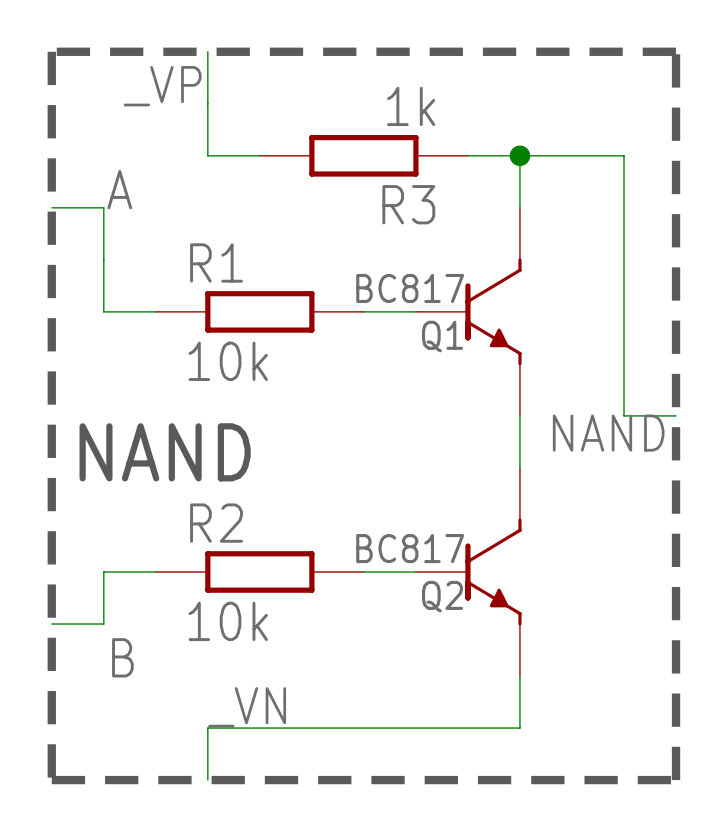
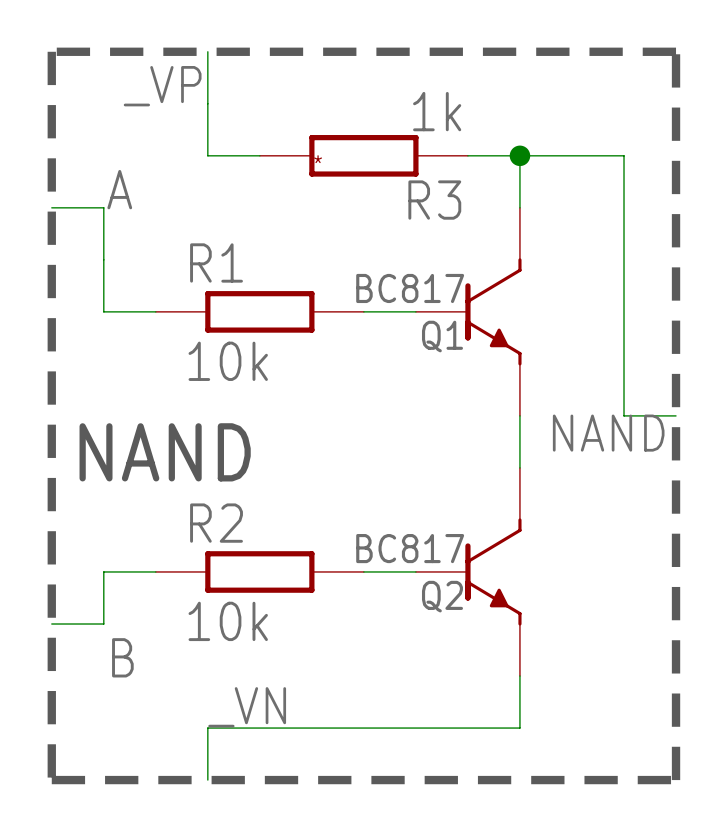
R3 value position: 1k (411, 106) -> 1k (437, 111)
R3 text: none -> * (318, 159)
R3 name position: R3 (408, 204) -> R3 (434, 200)

